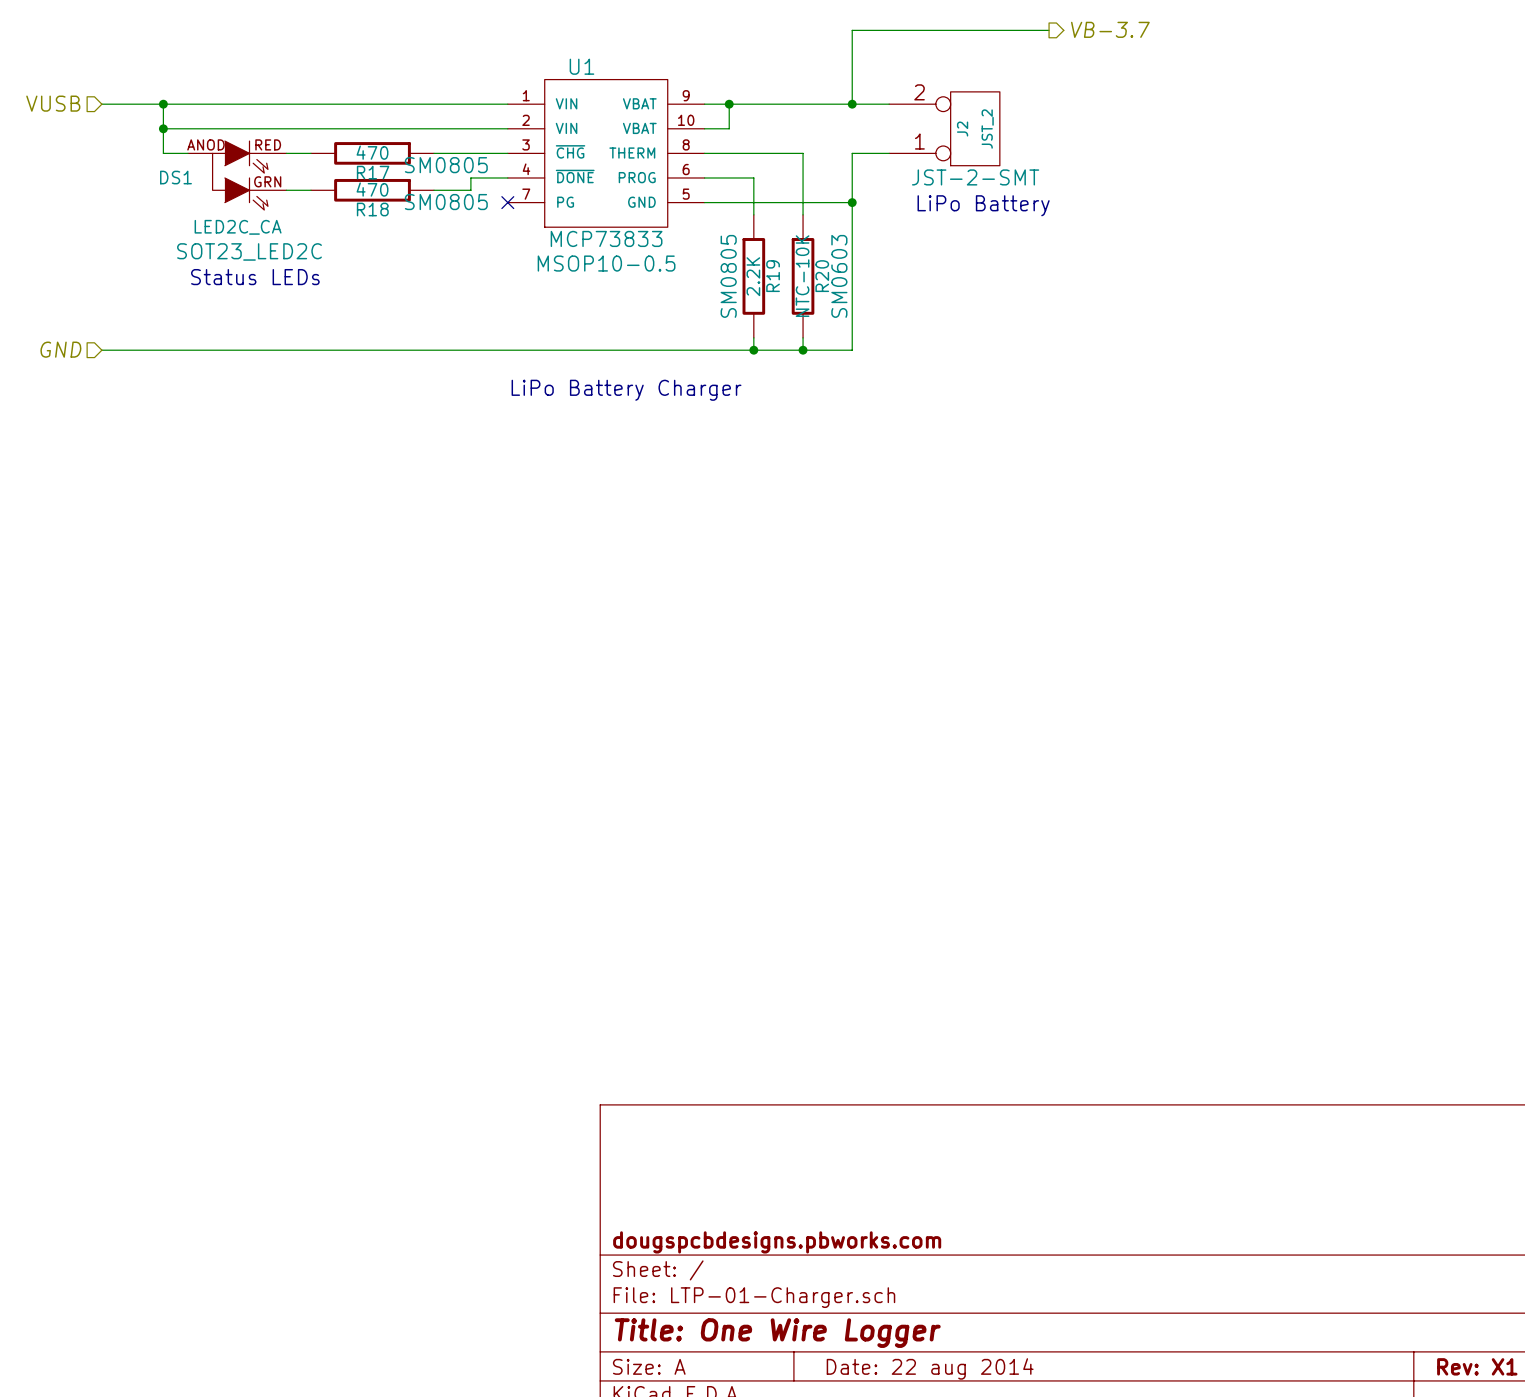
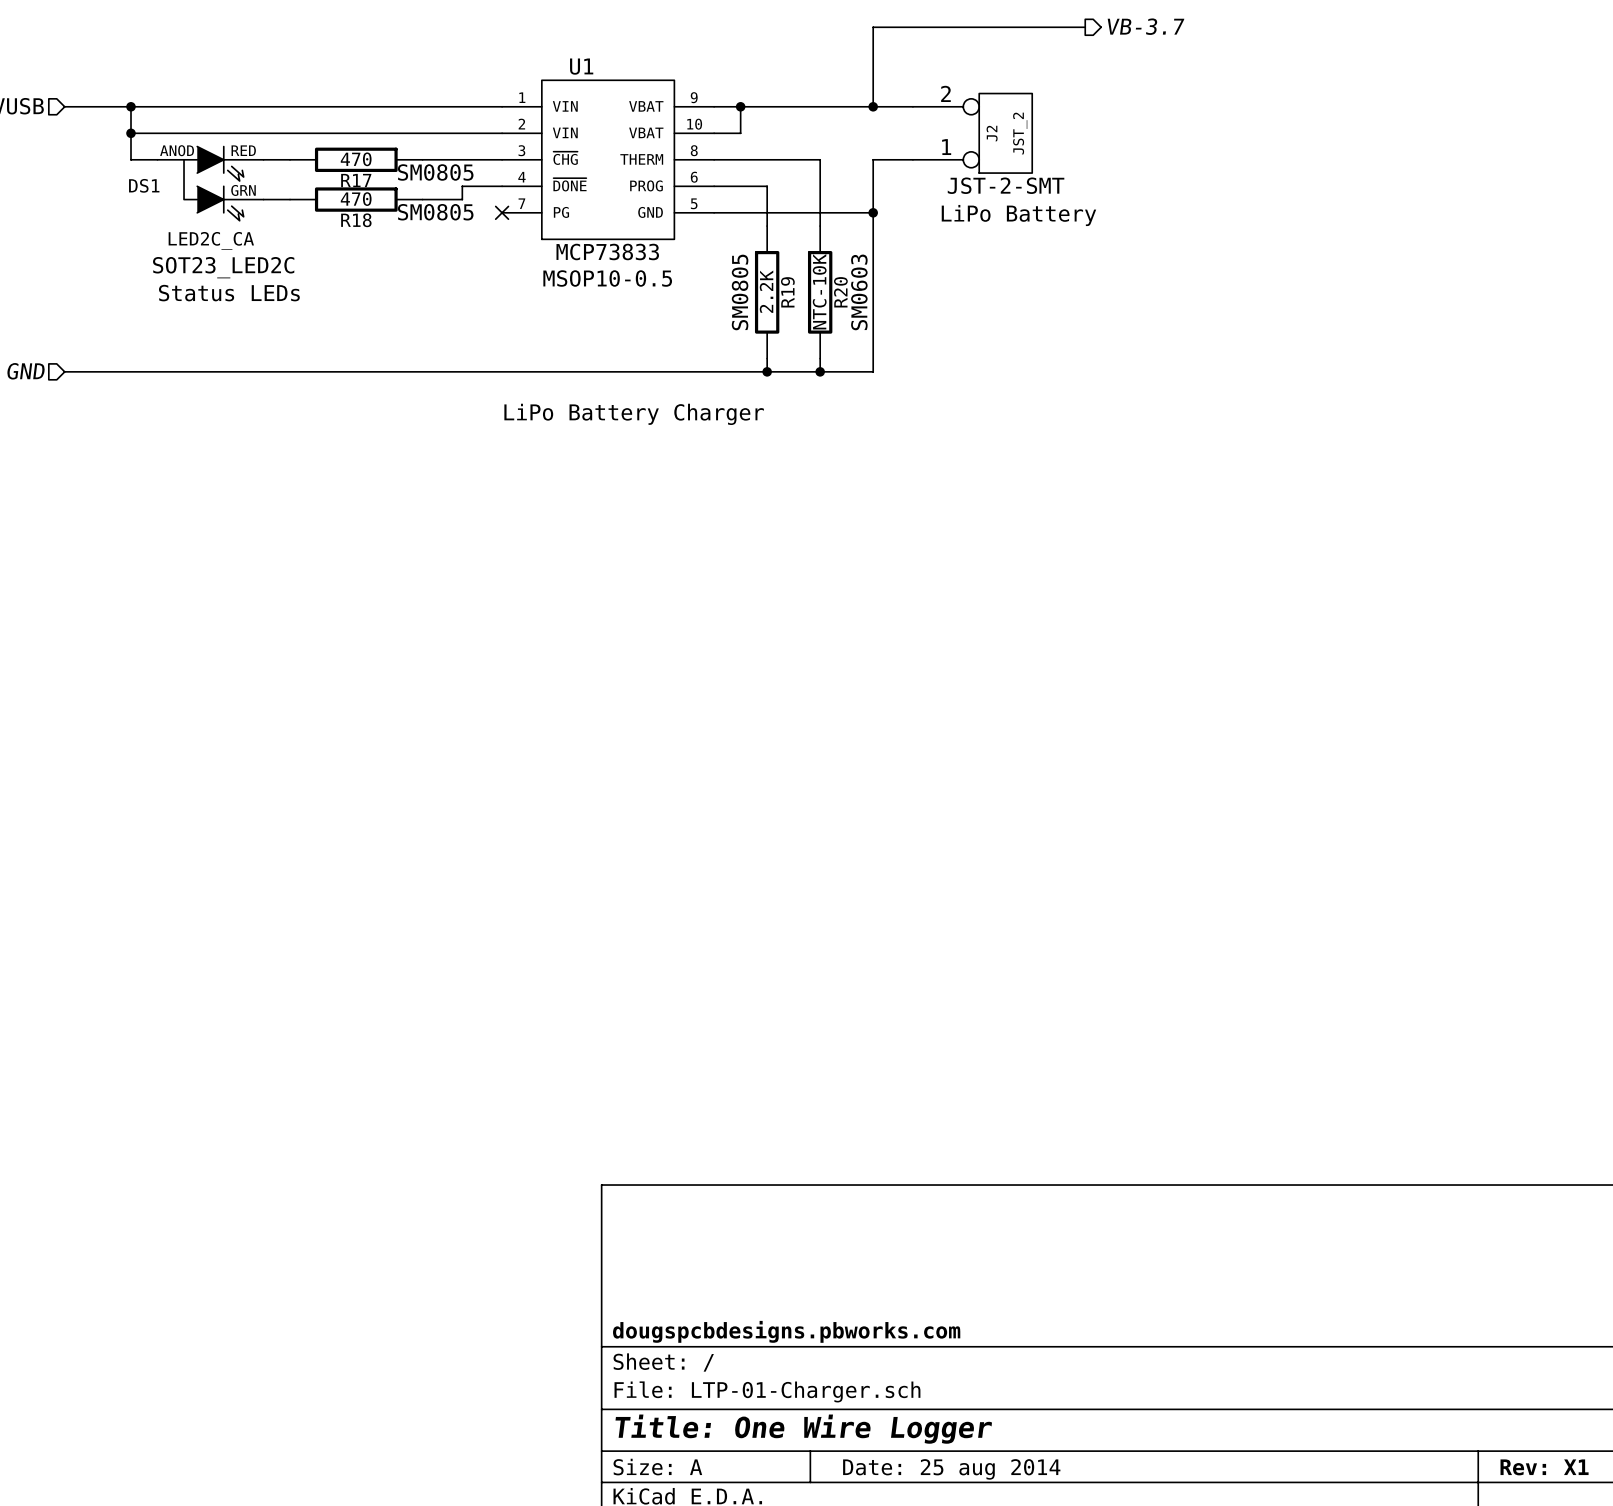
title block: Date: 22 aug 2014 (930, 1368) -> Date: 25 aug 2014 (951, 1469)

